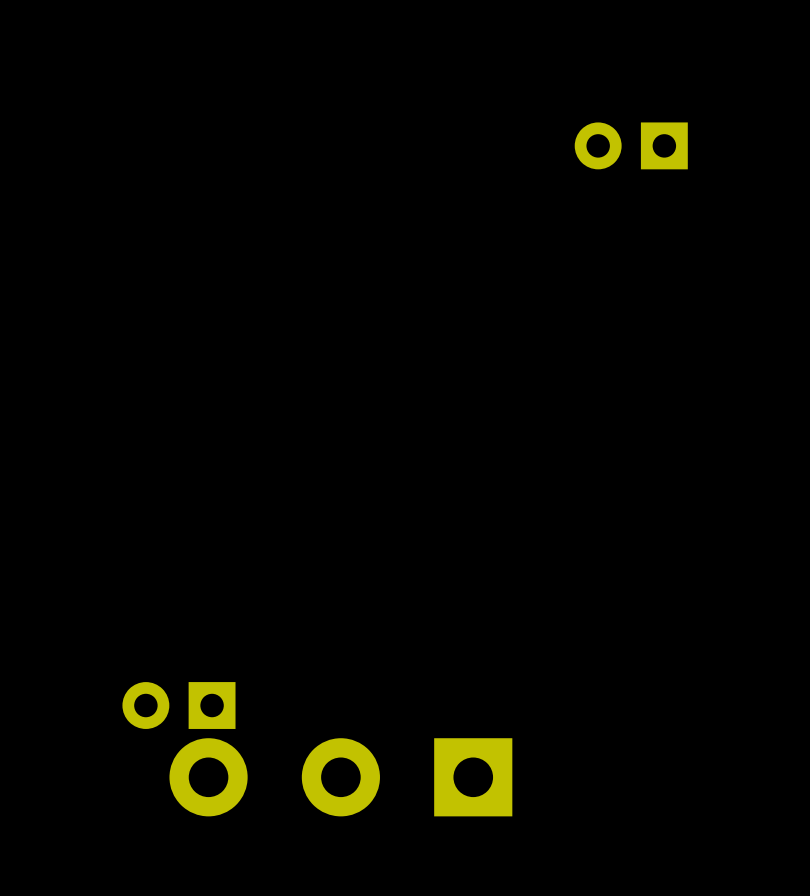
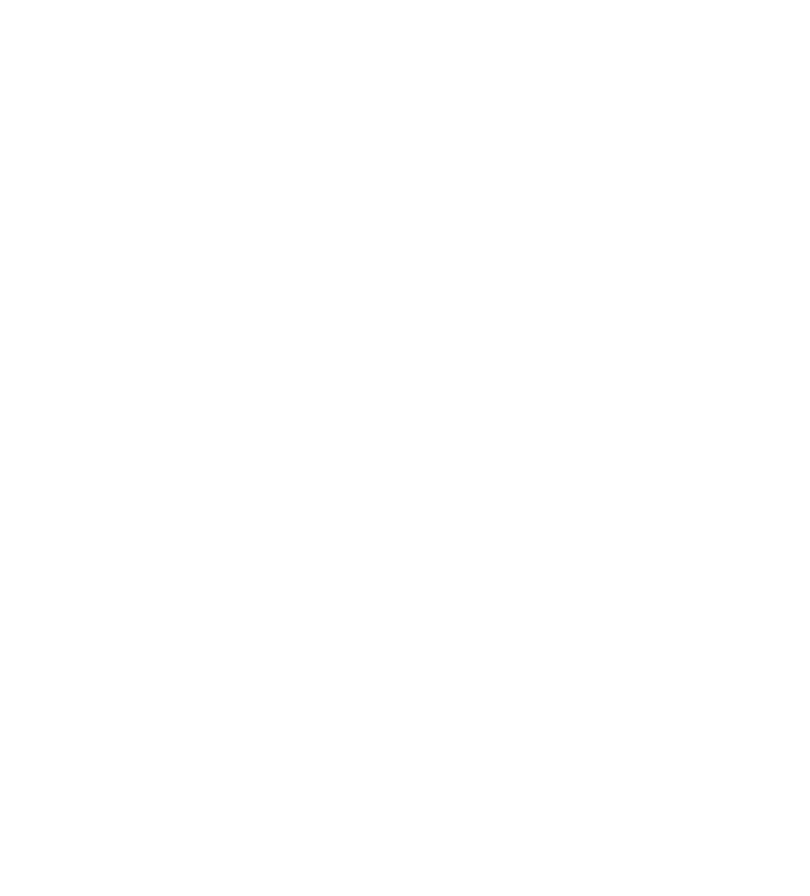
part: (631, 145) -> none
part: (178, 705) -> none
part: (340, 777) -> none

